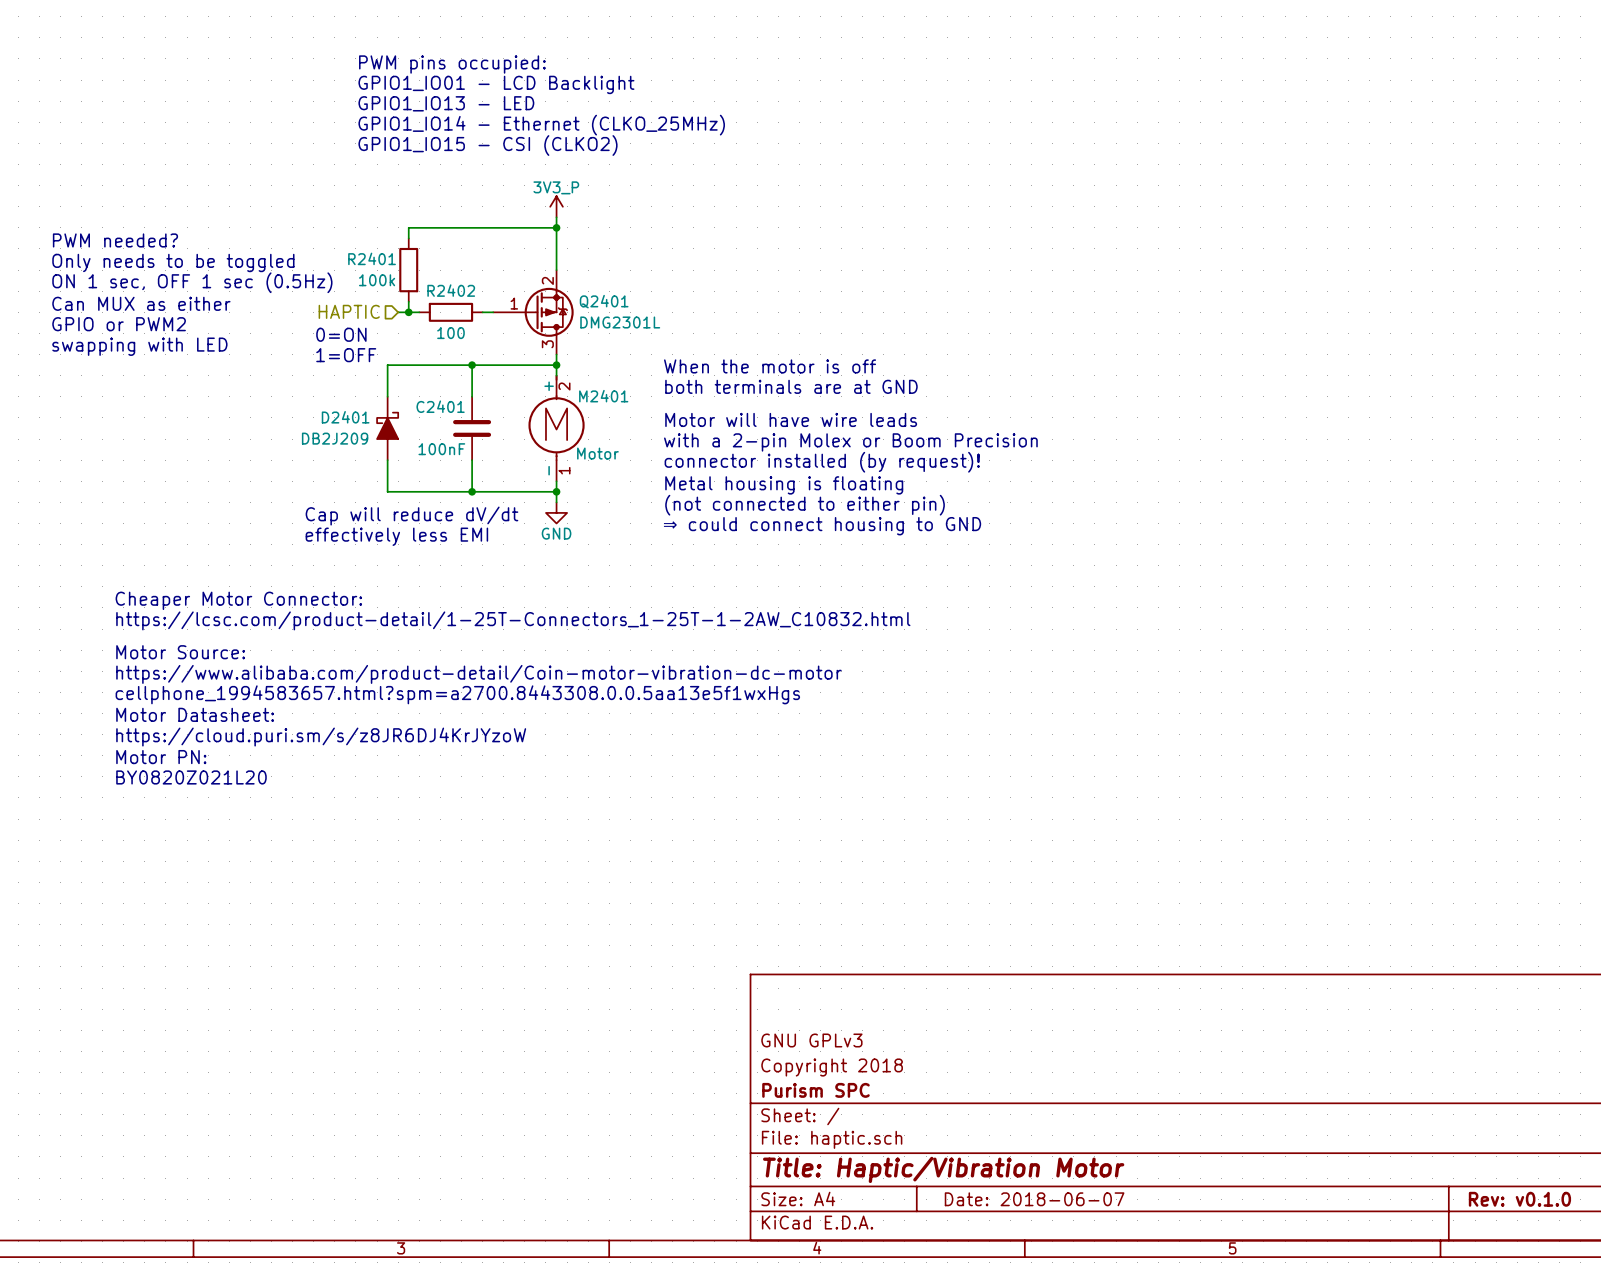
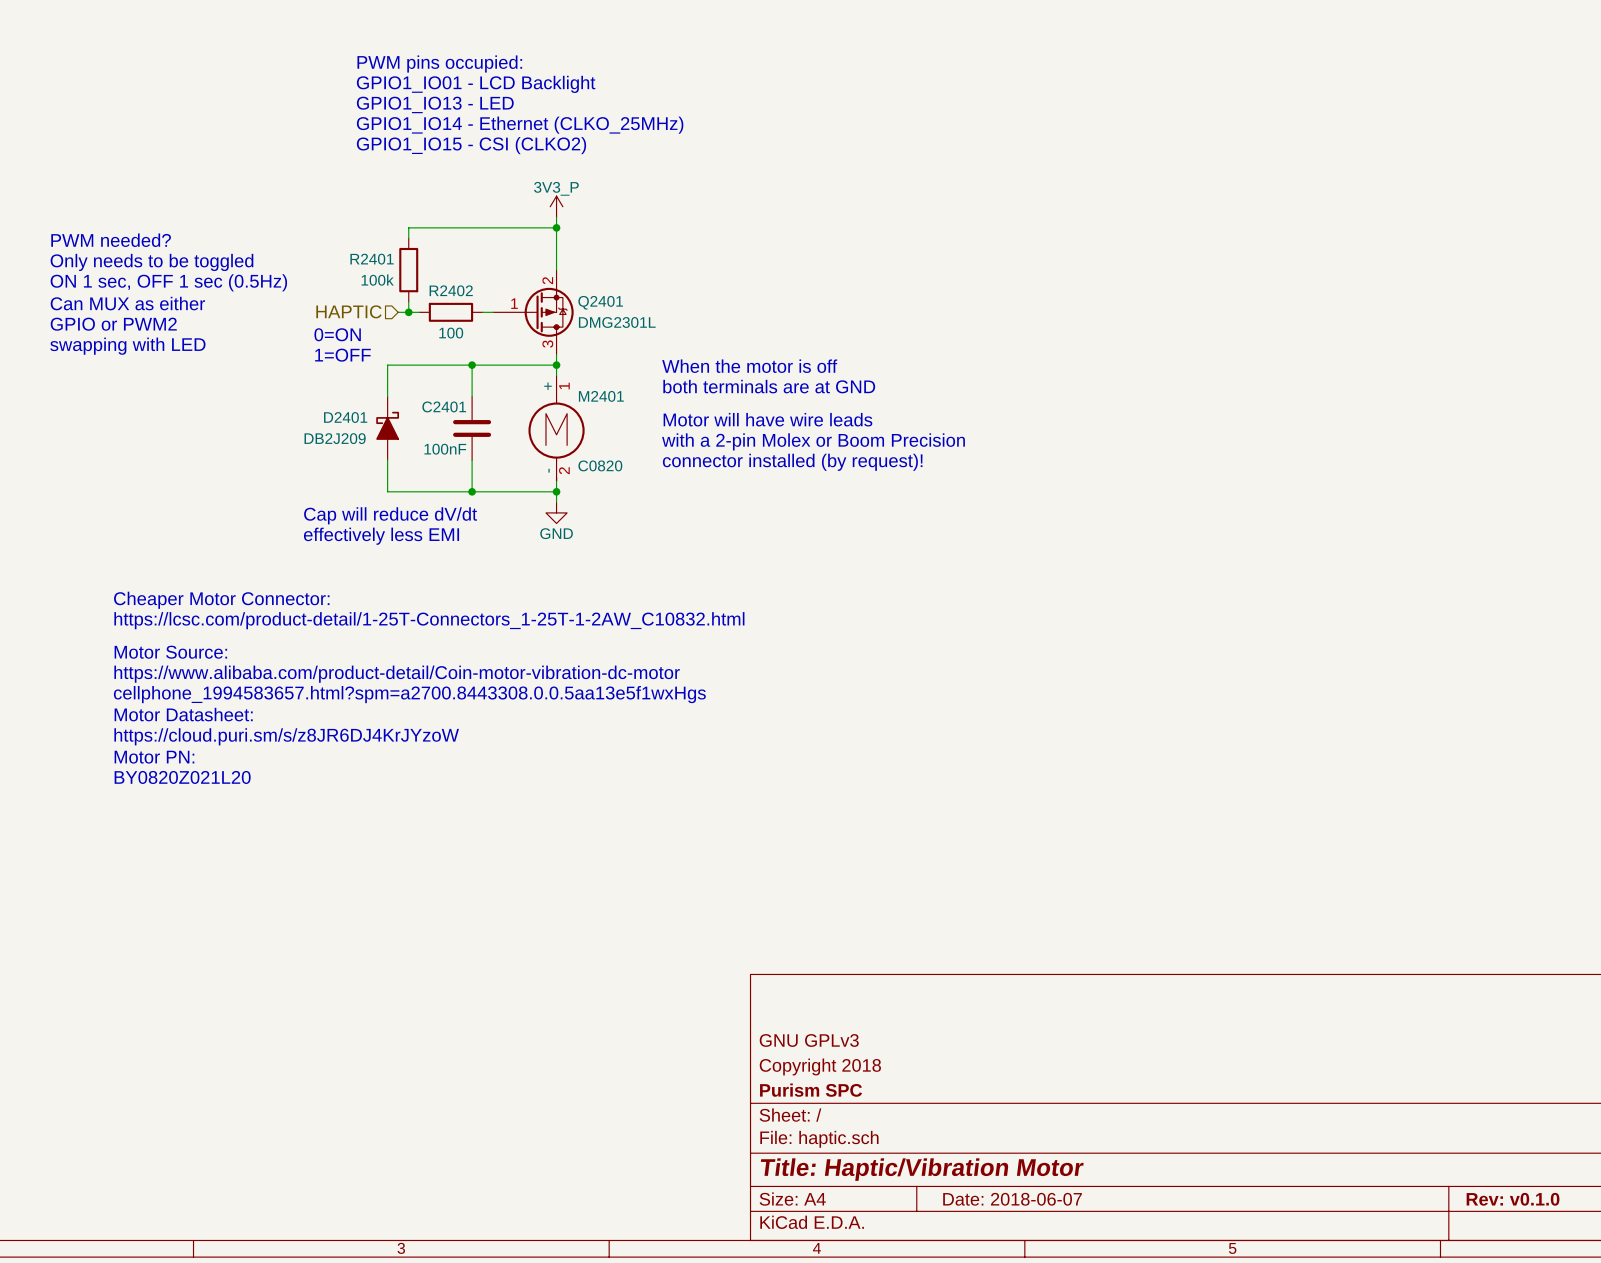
M2401 symbol: [528, 375, 585, 482] -> [528, 375, 585, 482]
M2401 value: Motor (597, 453) -> C0820 (600, 465)
text: Metal housing is floating (784, 485) -> none
text: (not connected to either pin) (805, 505) -> none
text: ⇒ could connect housing to GND (822, 526) -> none

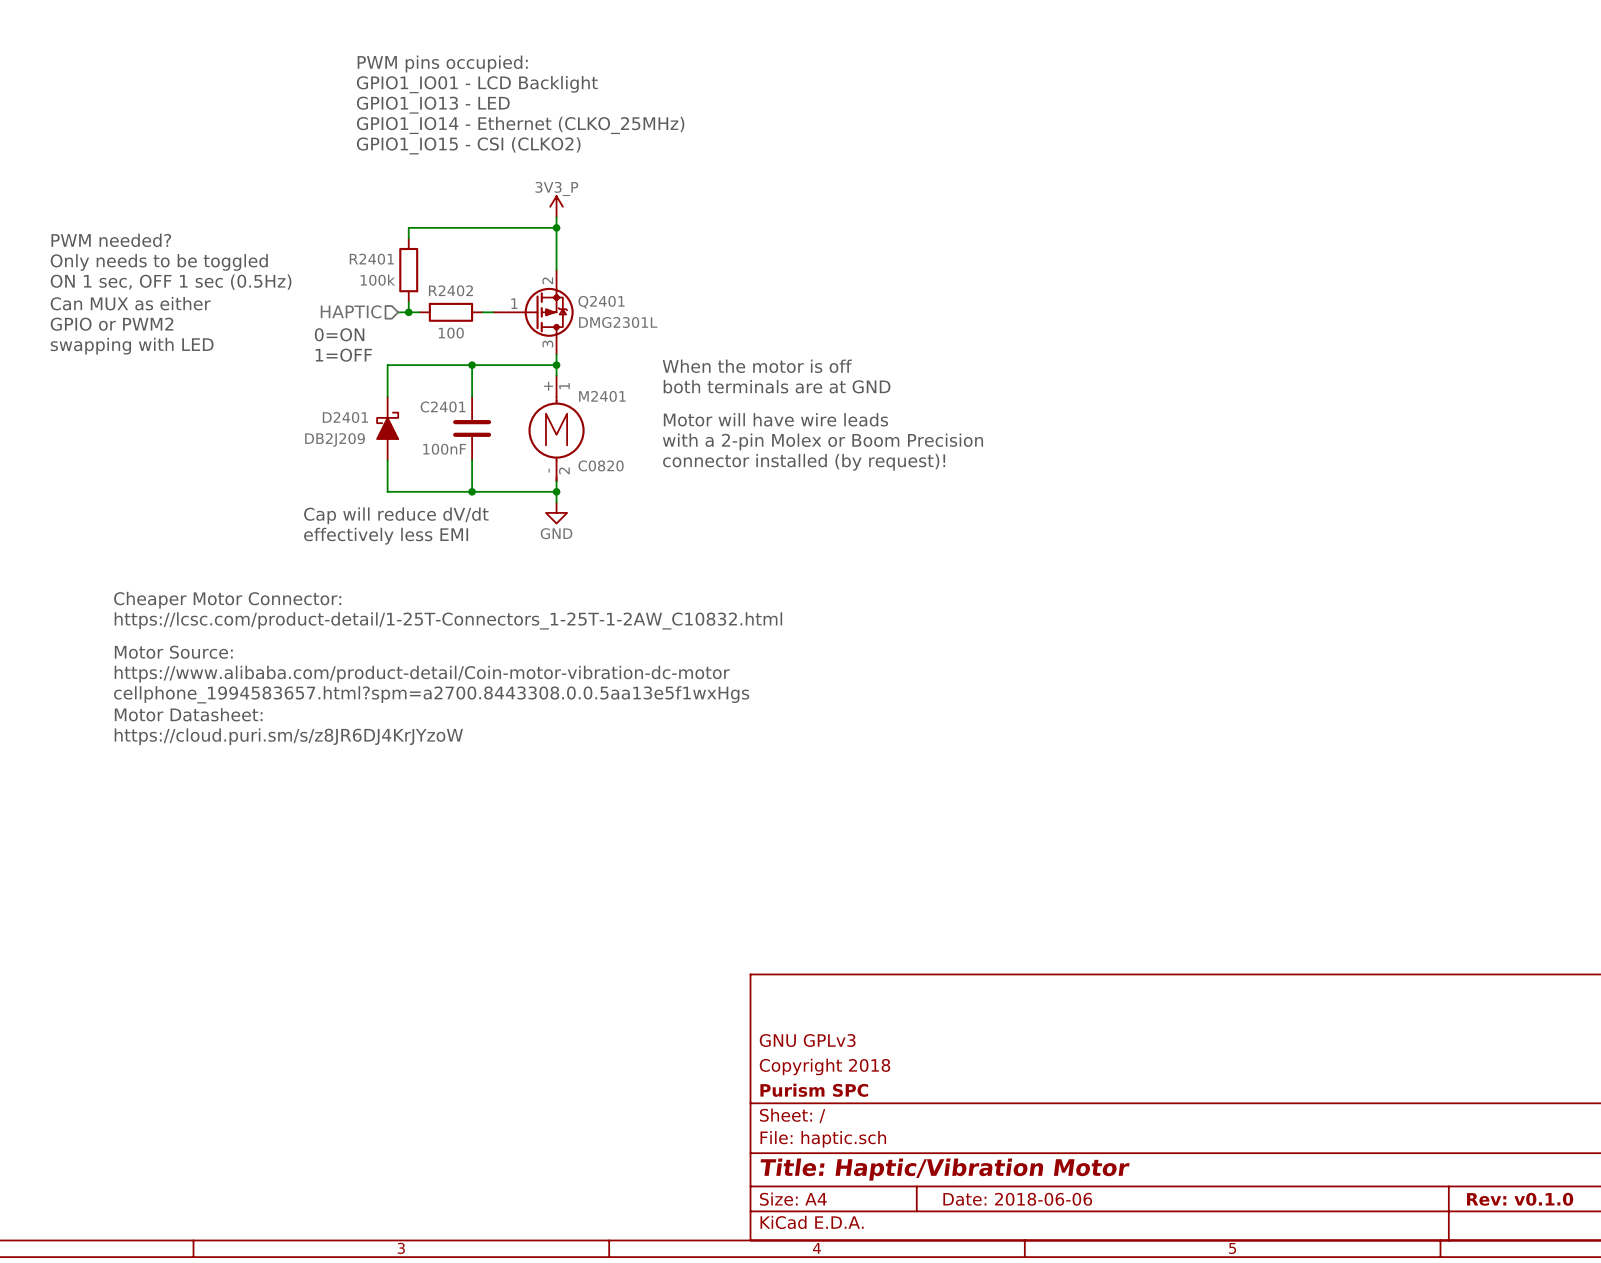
text: Motor PN: (154, 757) -> none
text: BY0820Z021L20 (182, 777) -> none
title block: Date: 2018-06-07 (1012, 1199) -> Date: 2018-06-06 (1017, 1199)

